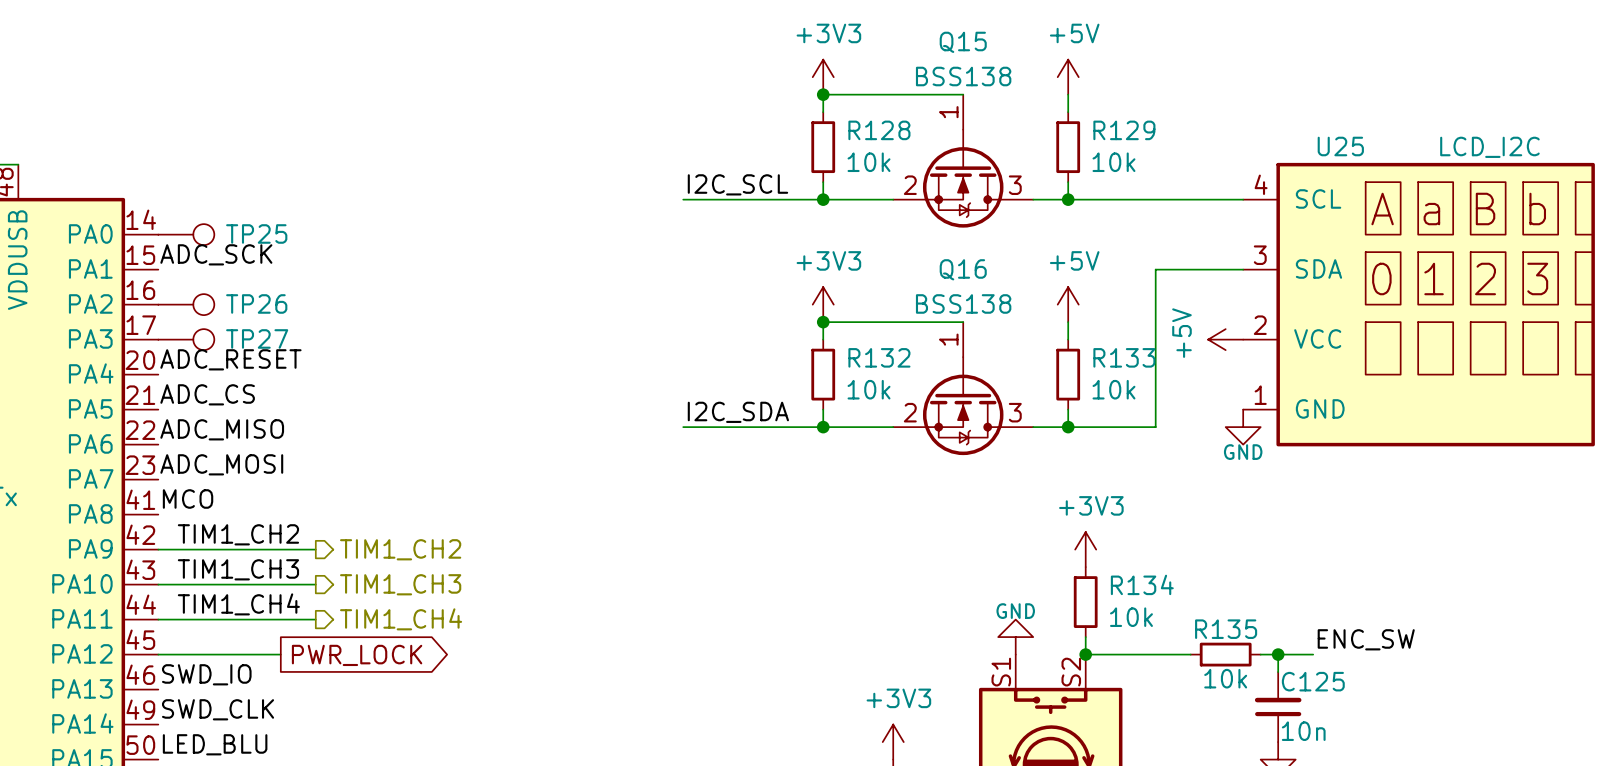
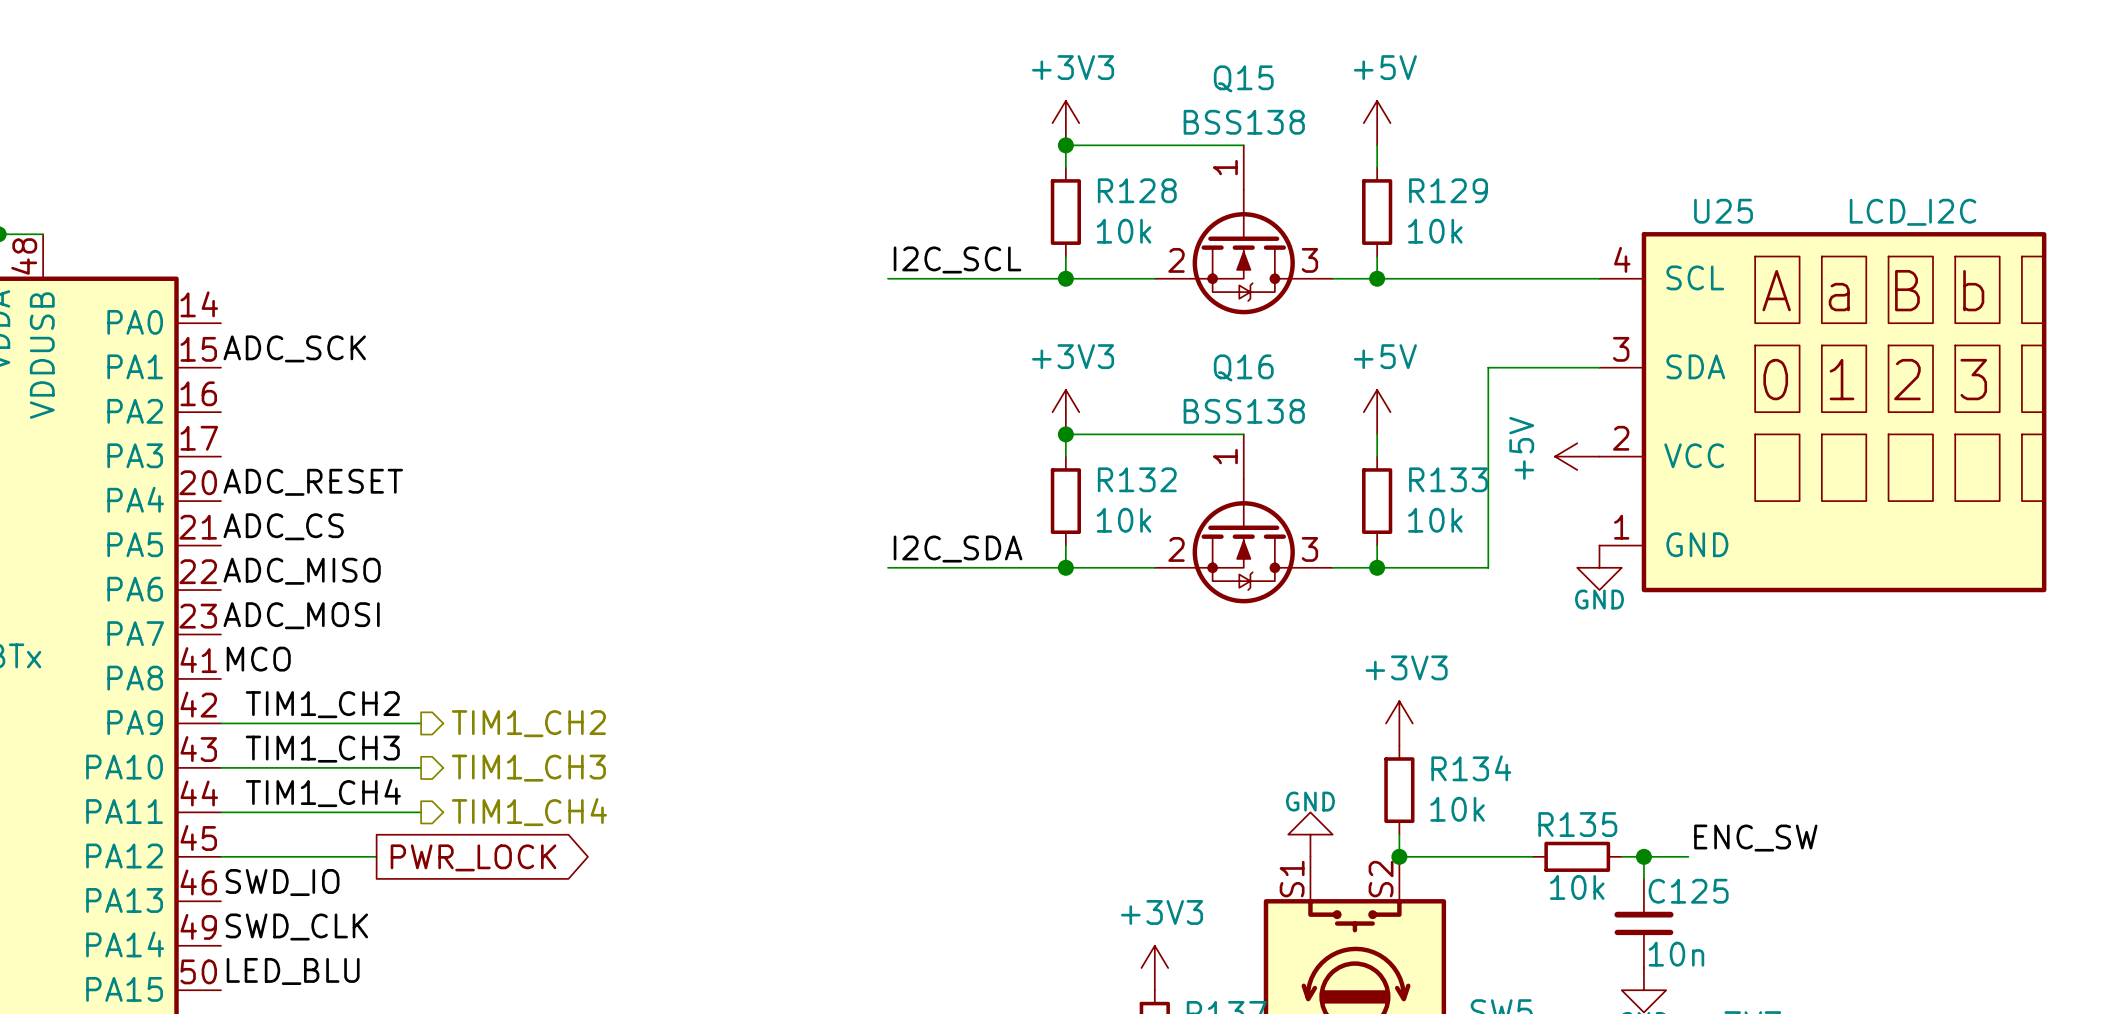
TP25: (186, 234) -> none
TP26: (186, 304) -> none
TP27: (186, 339) -> none

